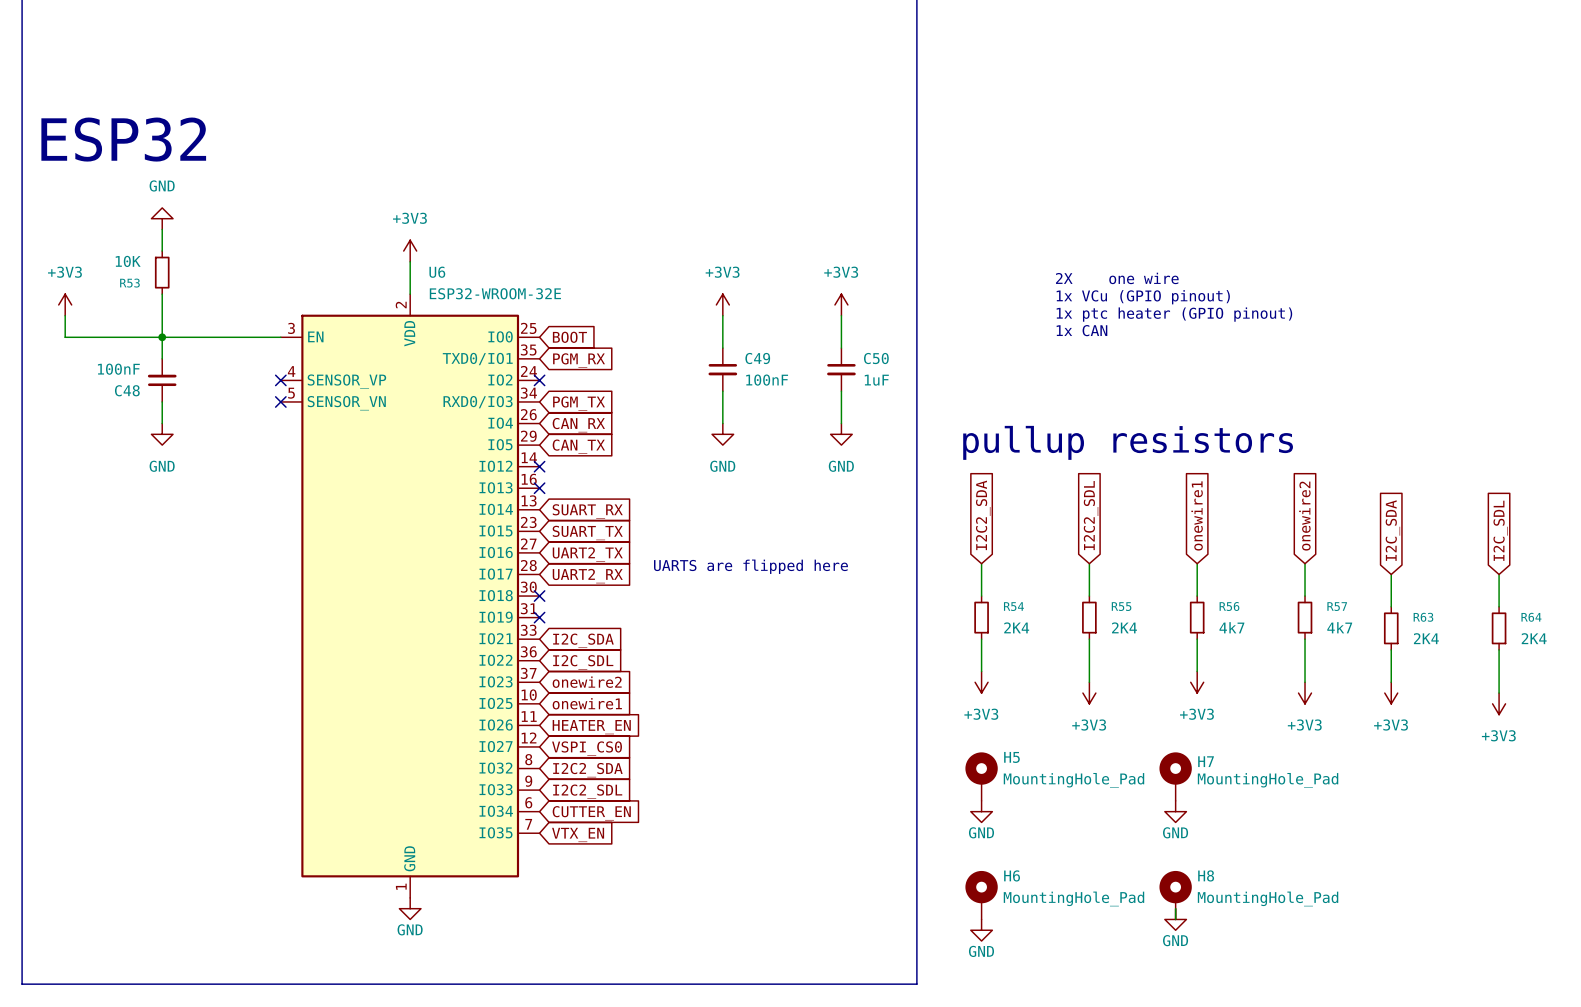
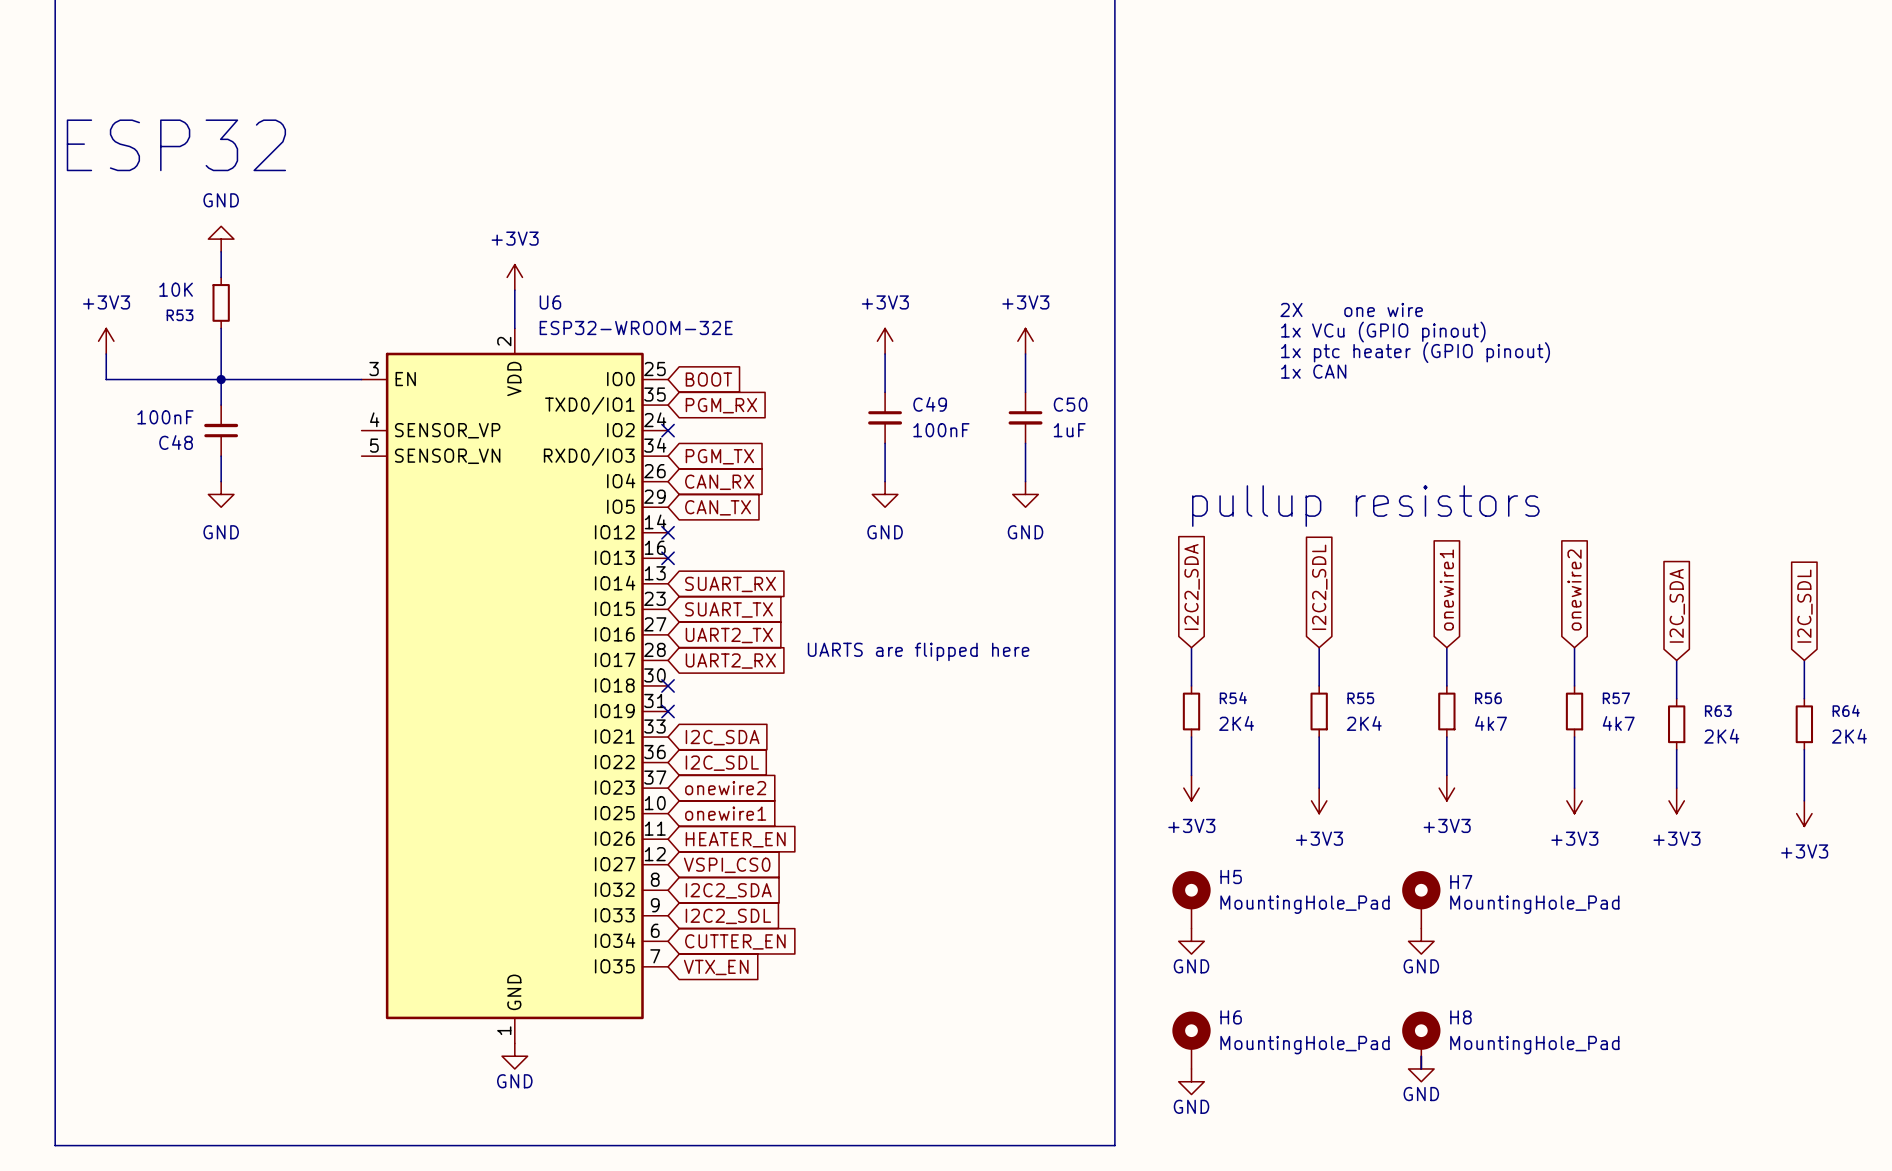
no-connect mark: (280, 380) -> none
no-connect mark: (280, 401) -> none

